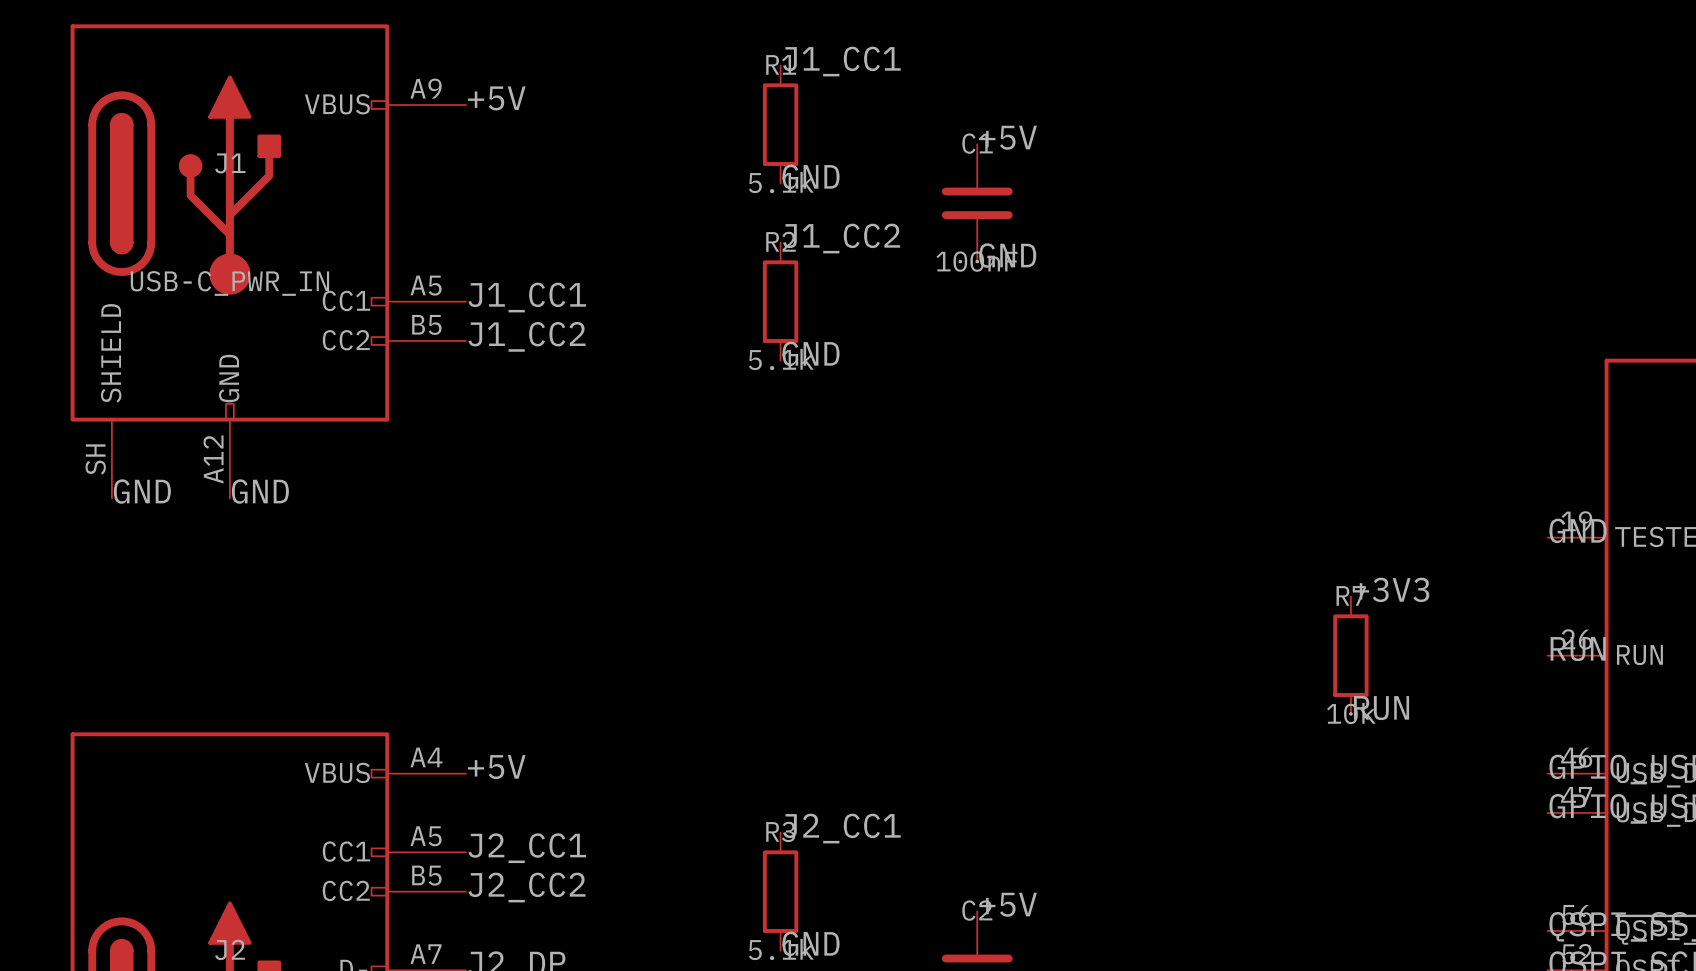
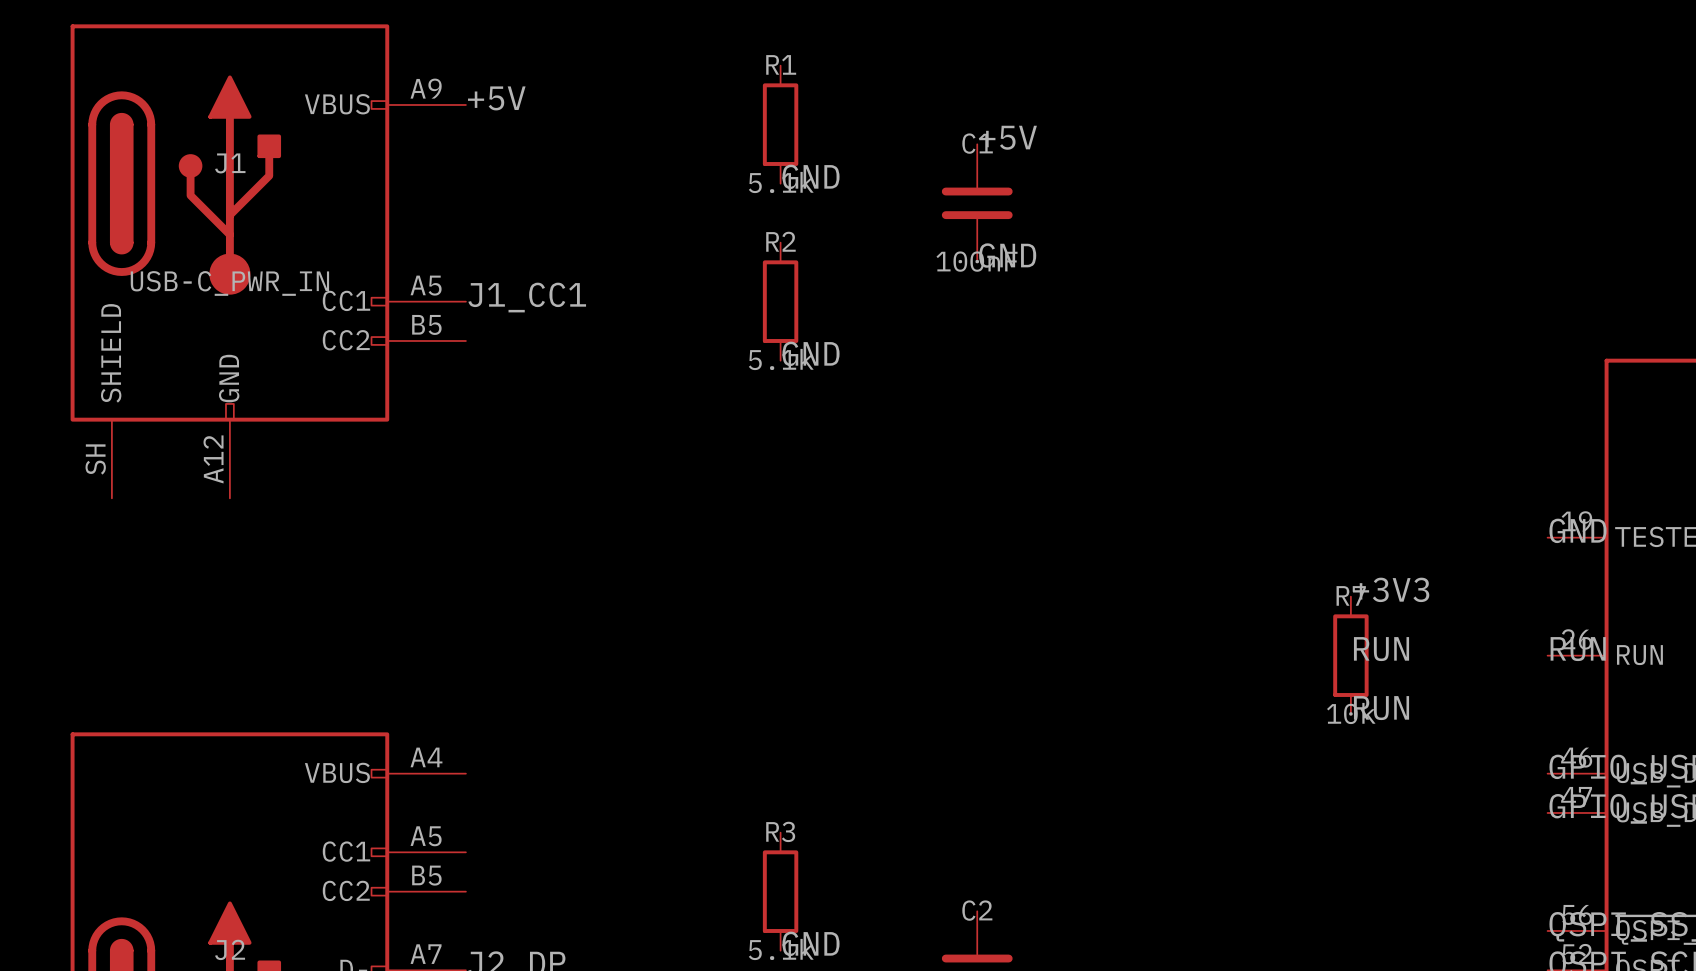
label: J1_CC1 (841, 61) -> none
label: J1_CC2 (841, 238) -> none
label: J1_CC2 (526, 336) -> none
label: GND (142, 491) -> none
label: GND (260, 491) -> none
label: none -> RUN (1381, 649)
label: +5V (496, 767) -> none
label: J2_CC1 (841, 828) -> none
label: J2_CC1 (527, 848) -> none
label: J2_CC2 (526, 887) -> none
label: +5V (1008, 904) -> none

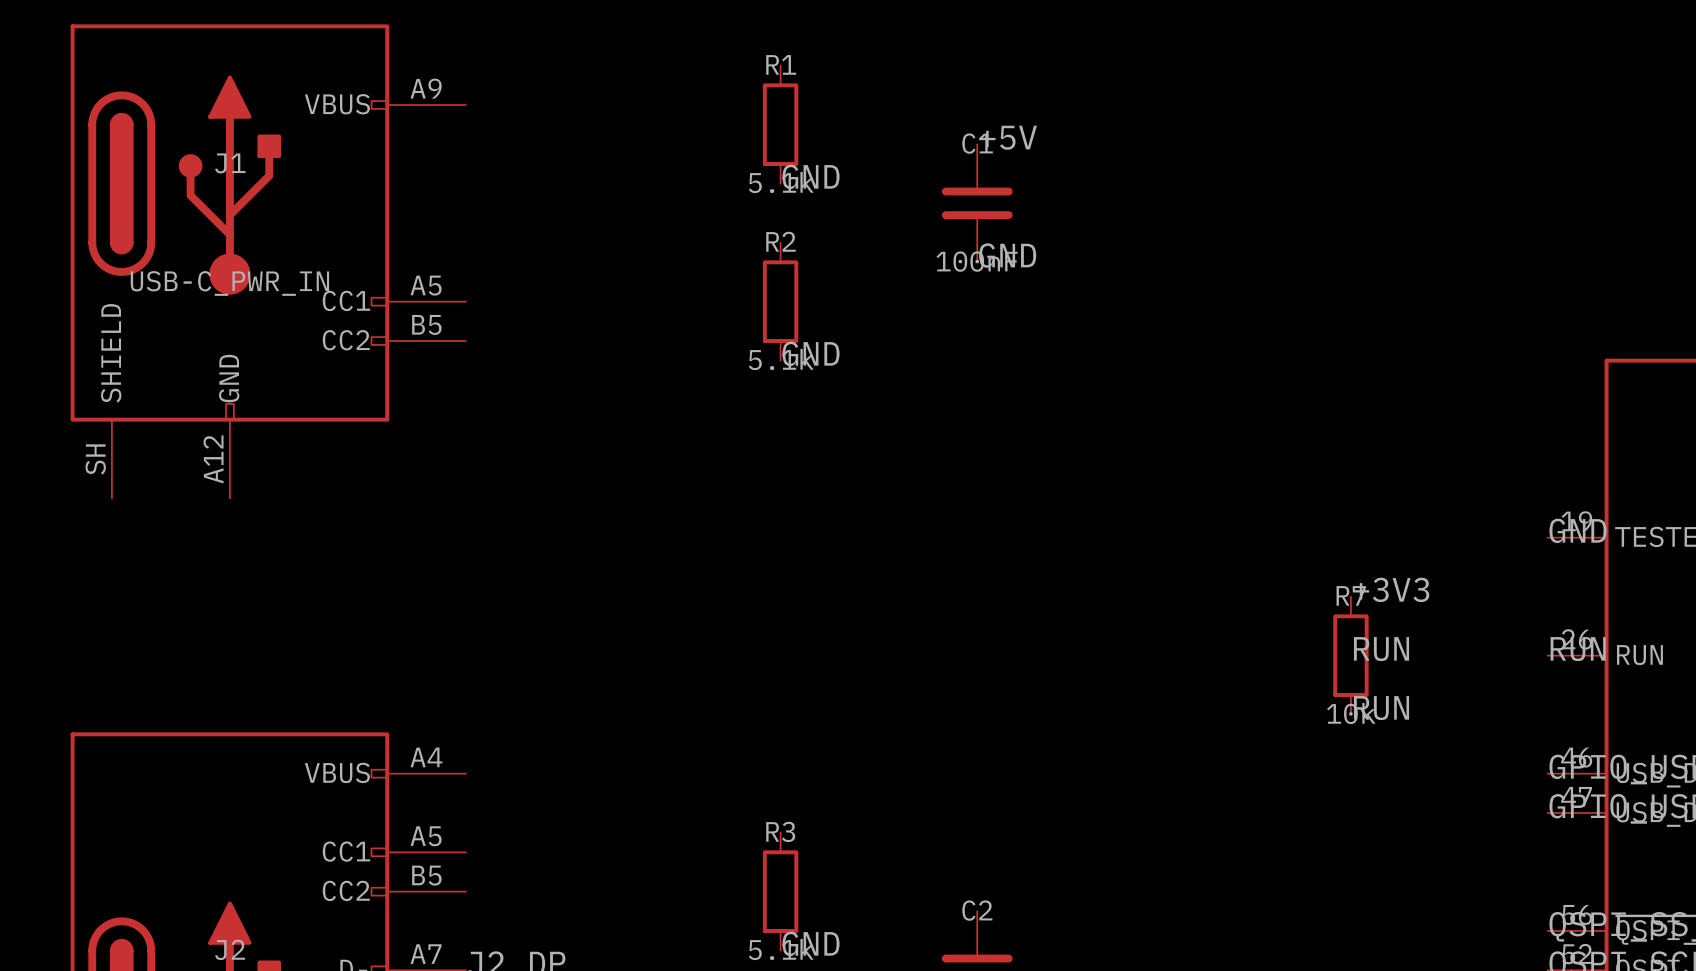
label: +5V (496, 98) -> none
label: J1_CC1 (527, 297) -> none

